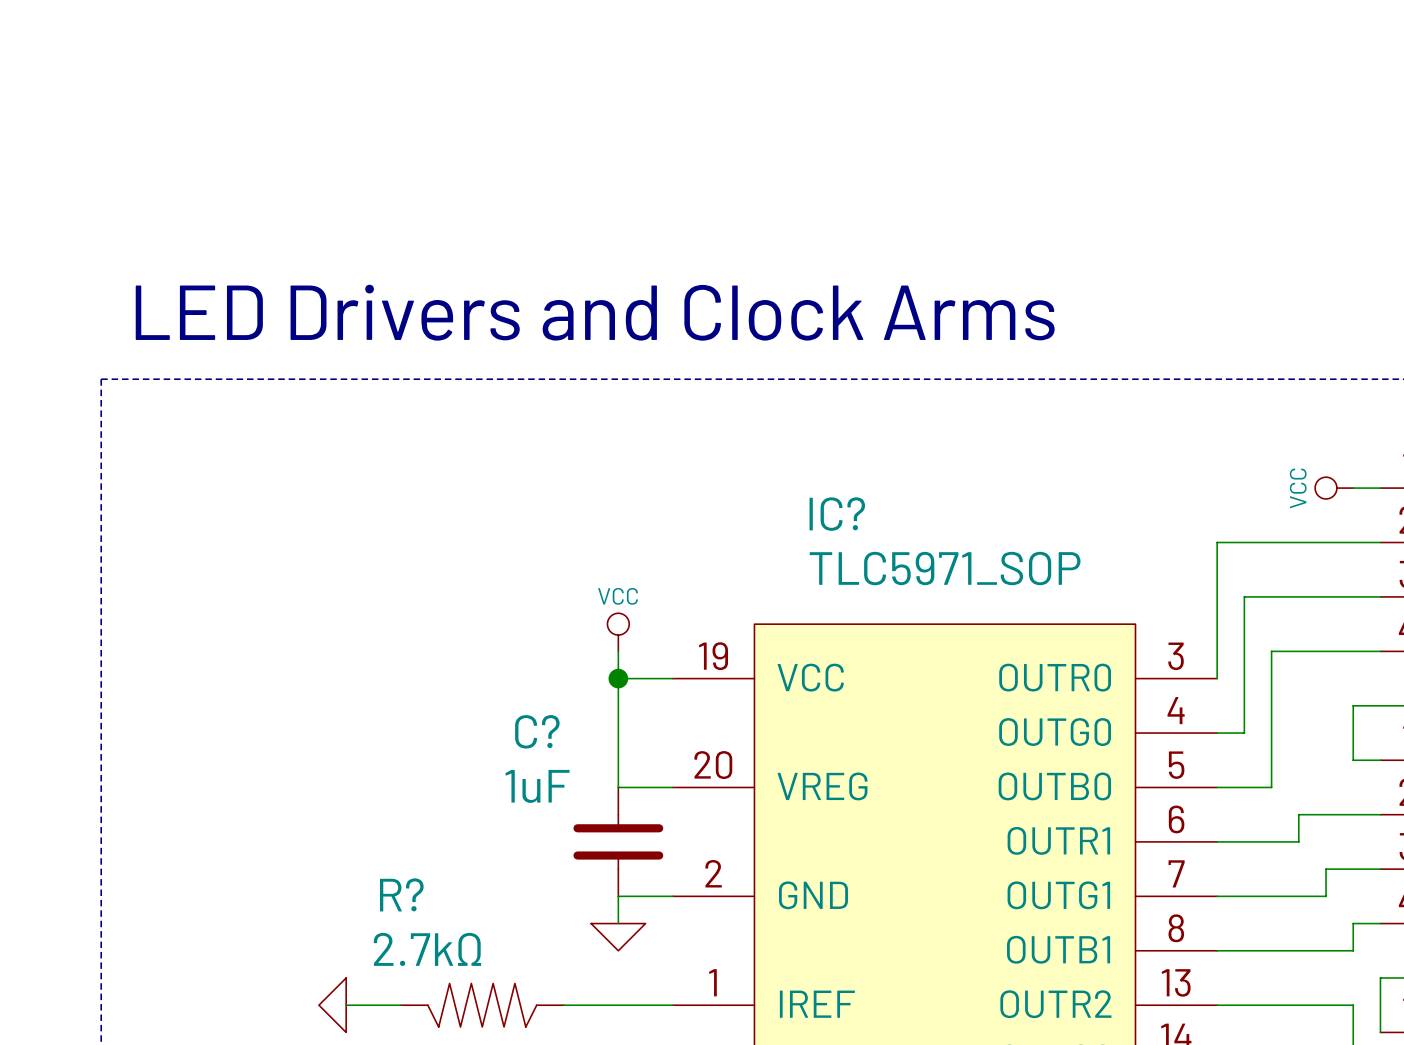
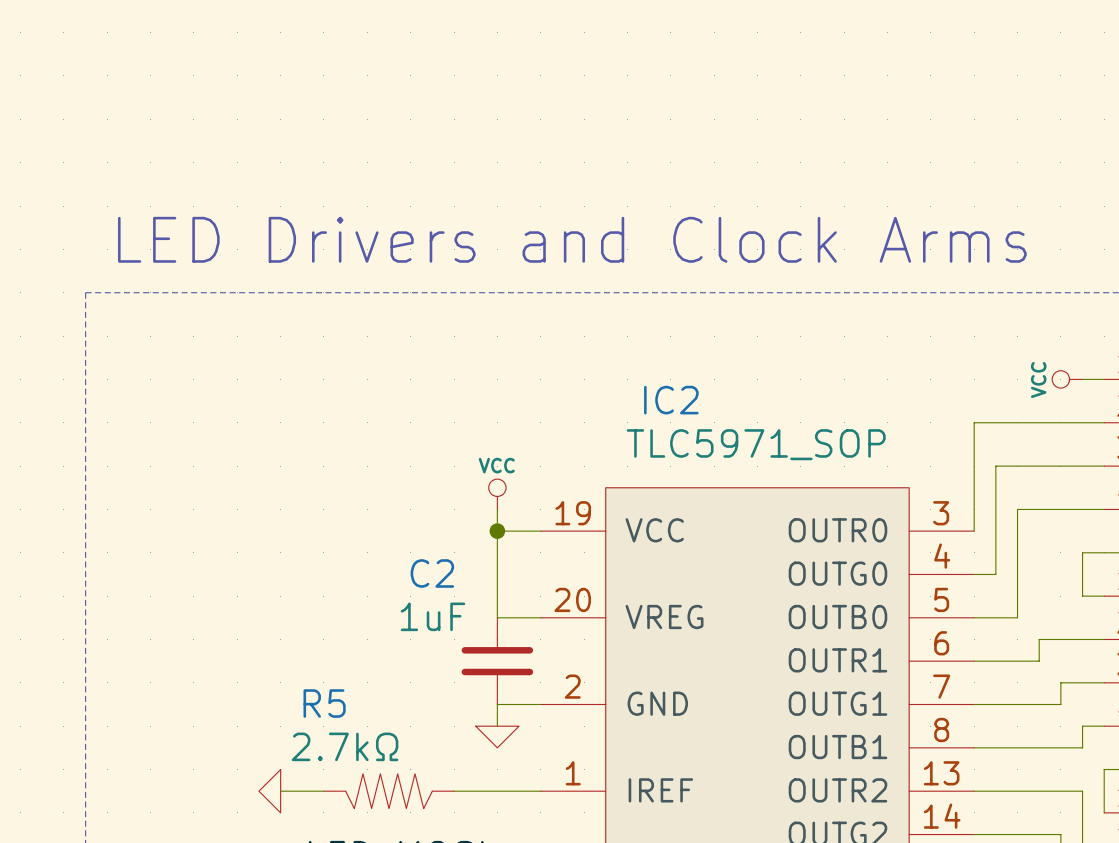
IC? name: IC? (837, 514) -> IC2 (671, 400)
C? name: C? (537, 731) -> C2 (432, 573)
R? name: R? (401, 894) -> R5 (324, 703)

